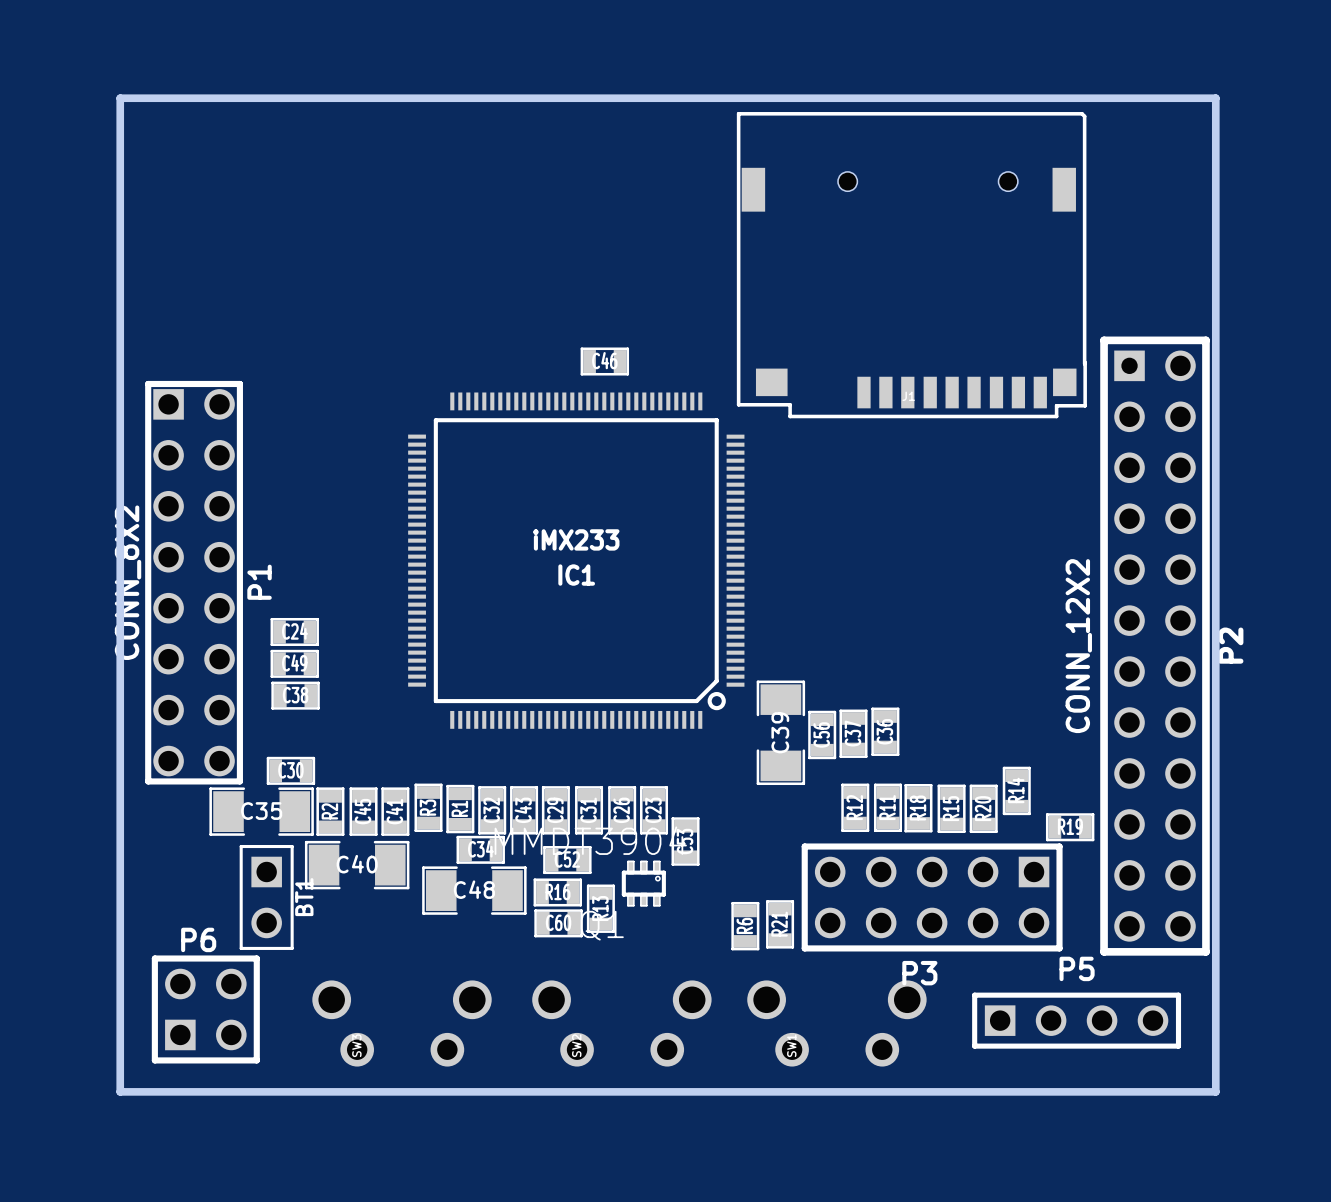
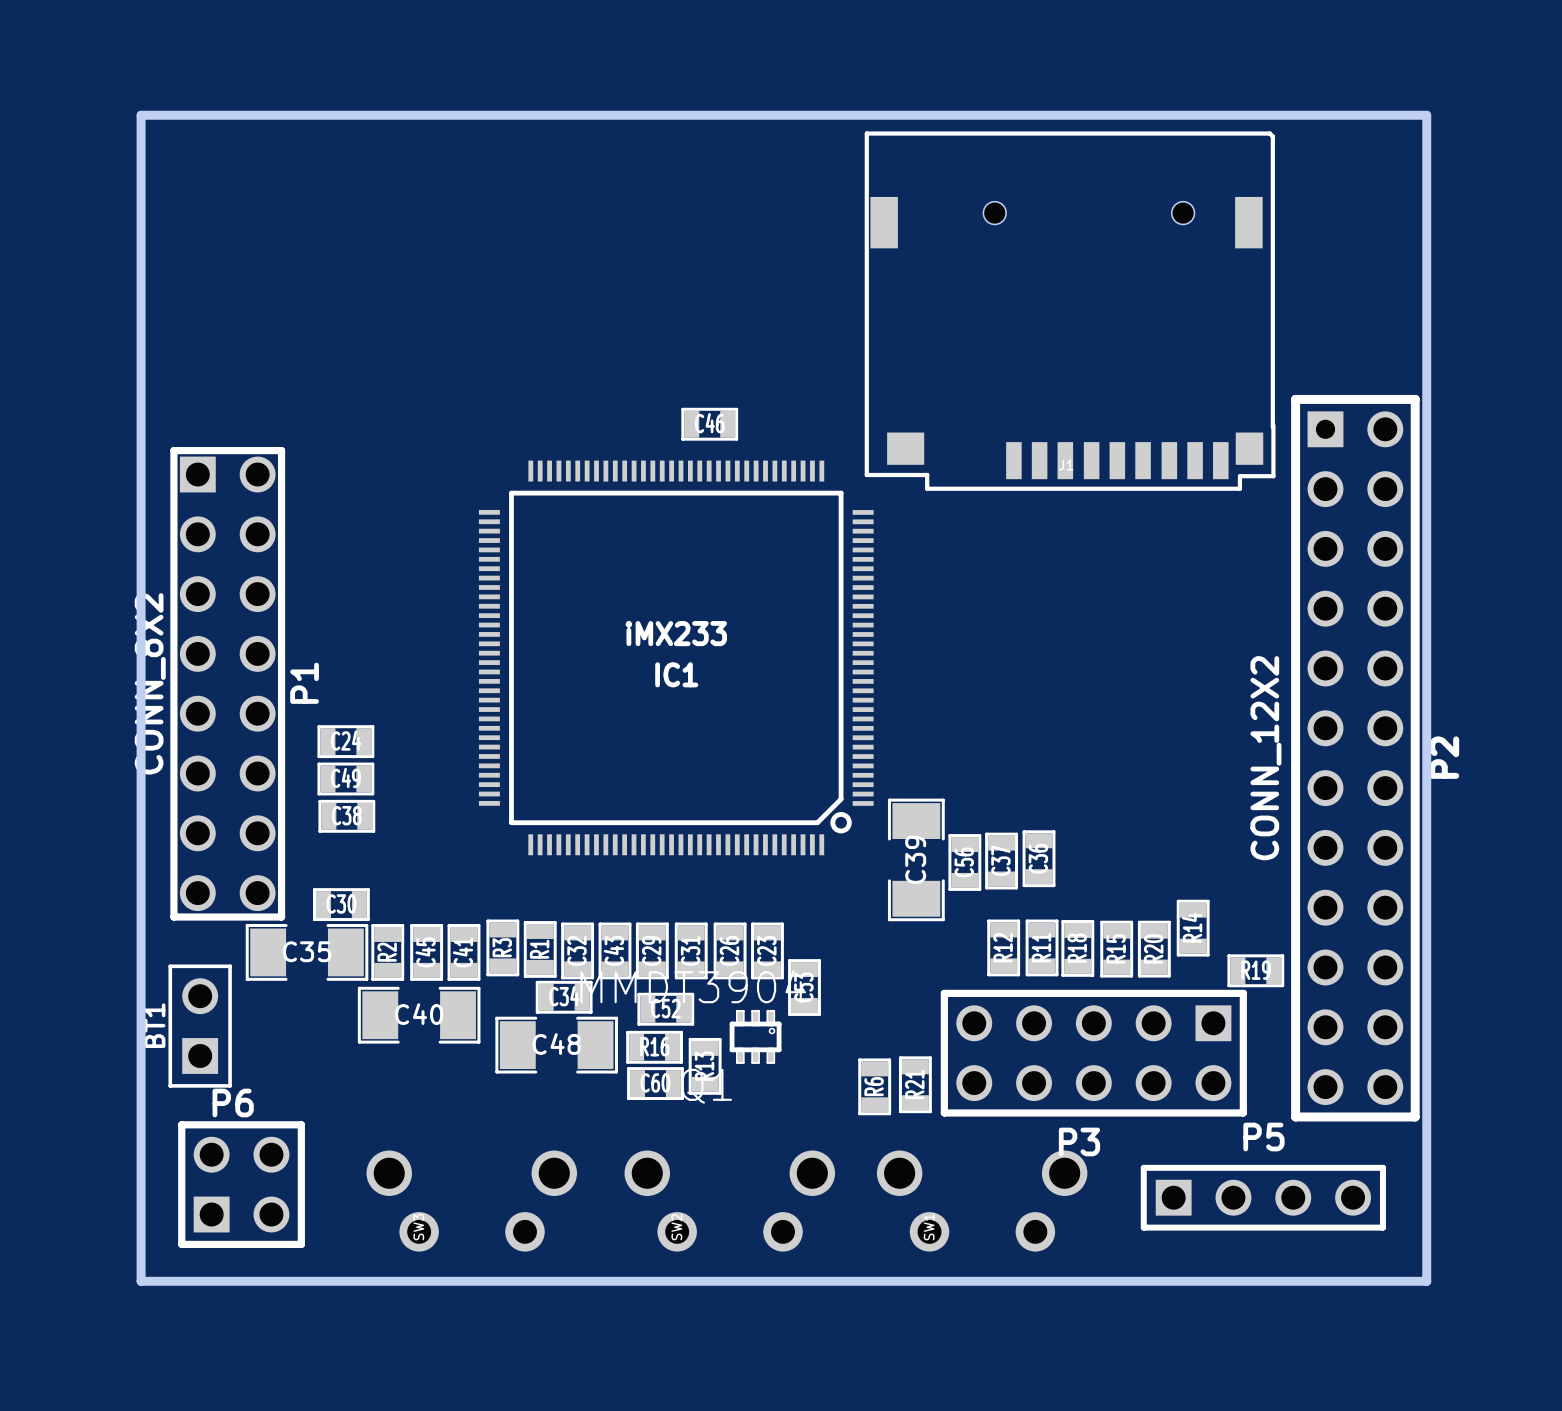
BT1 rotation: 0° (266, 897) -> 180° (200, 1026)
BT1 position: (266, 897) -> (200, 1026)

